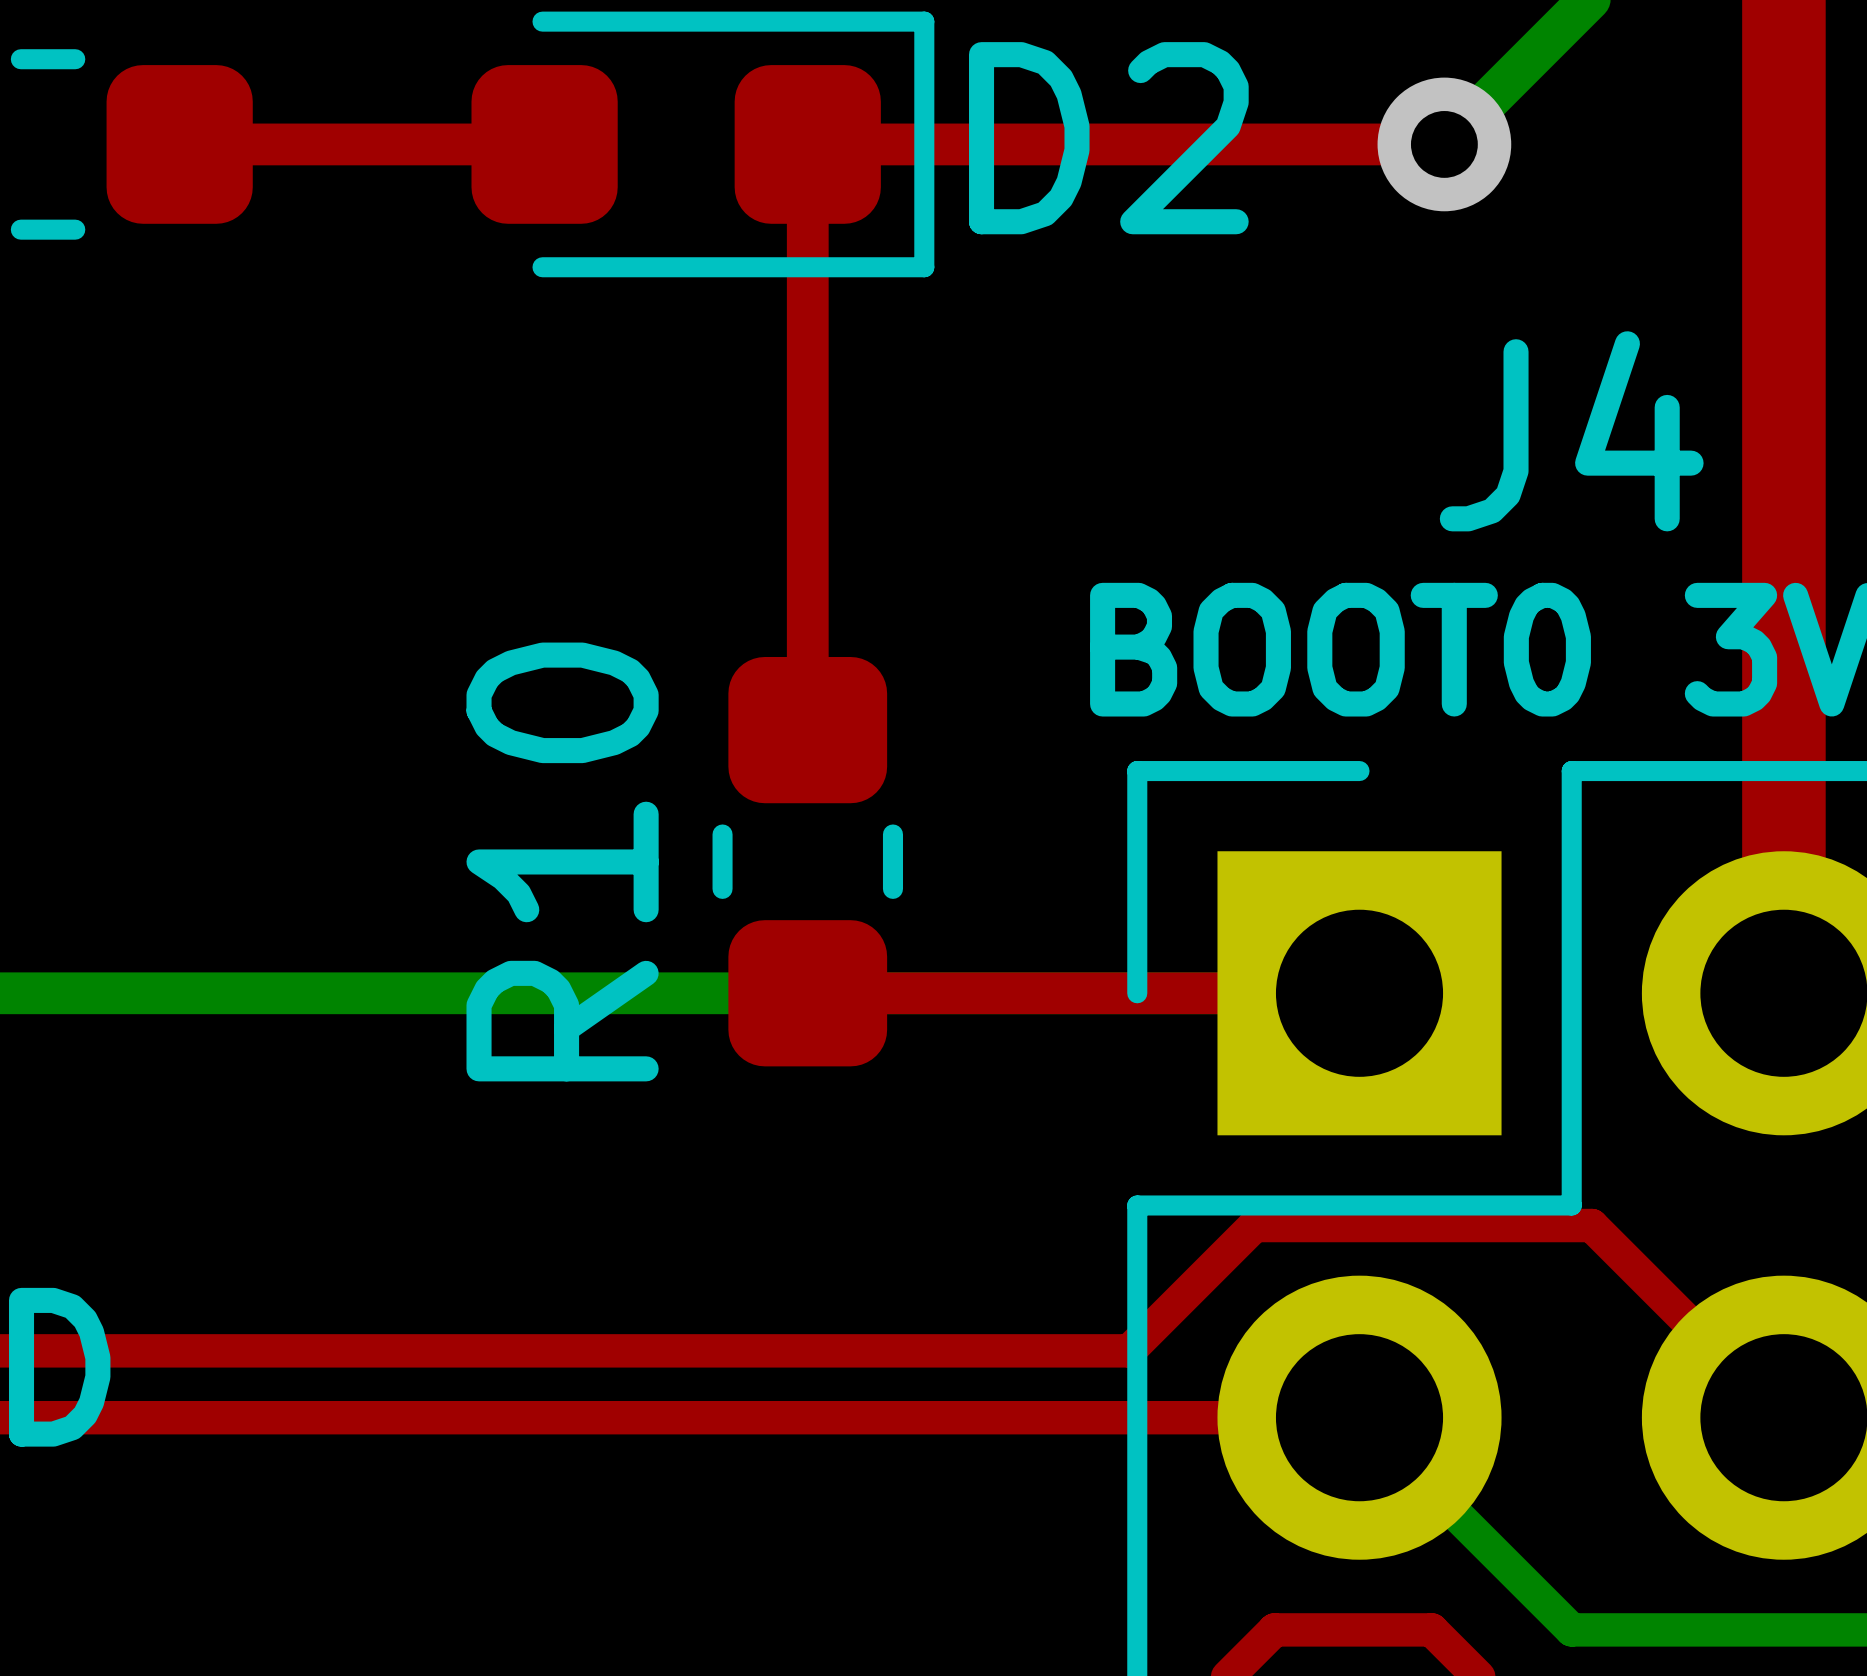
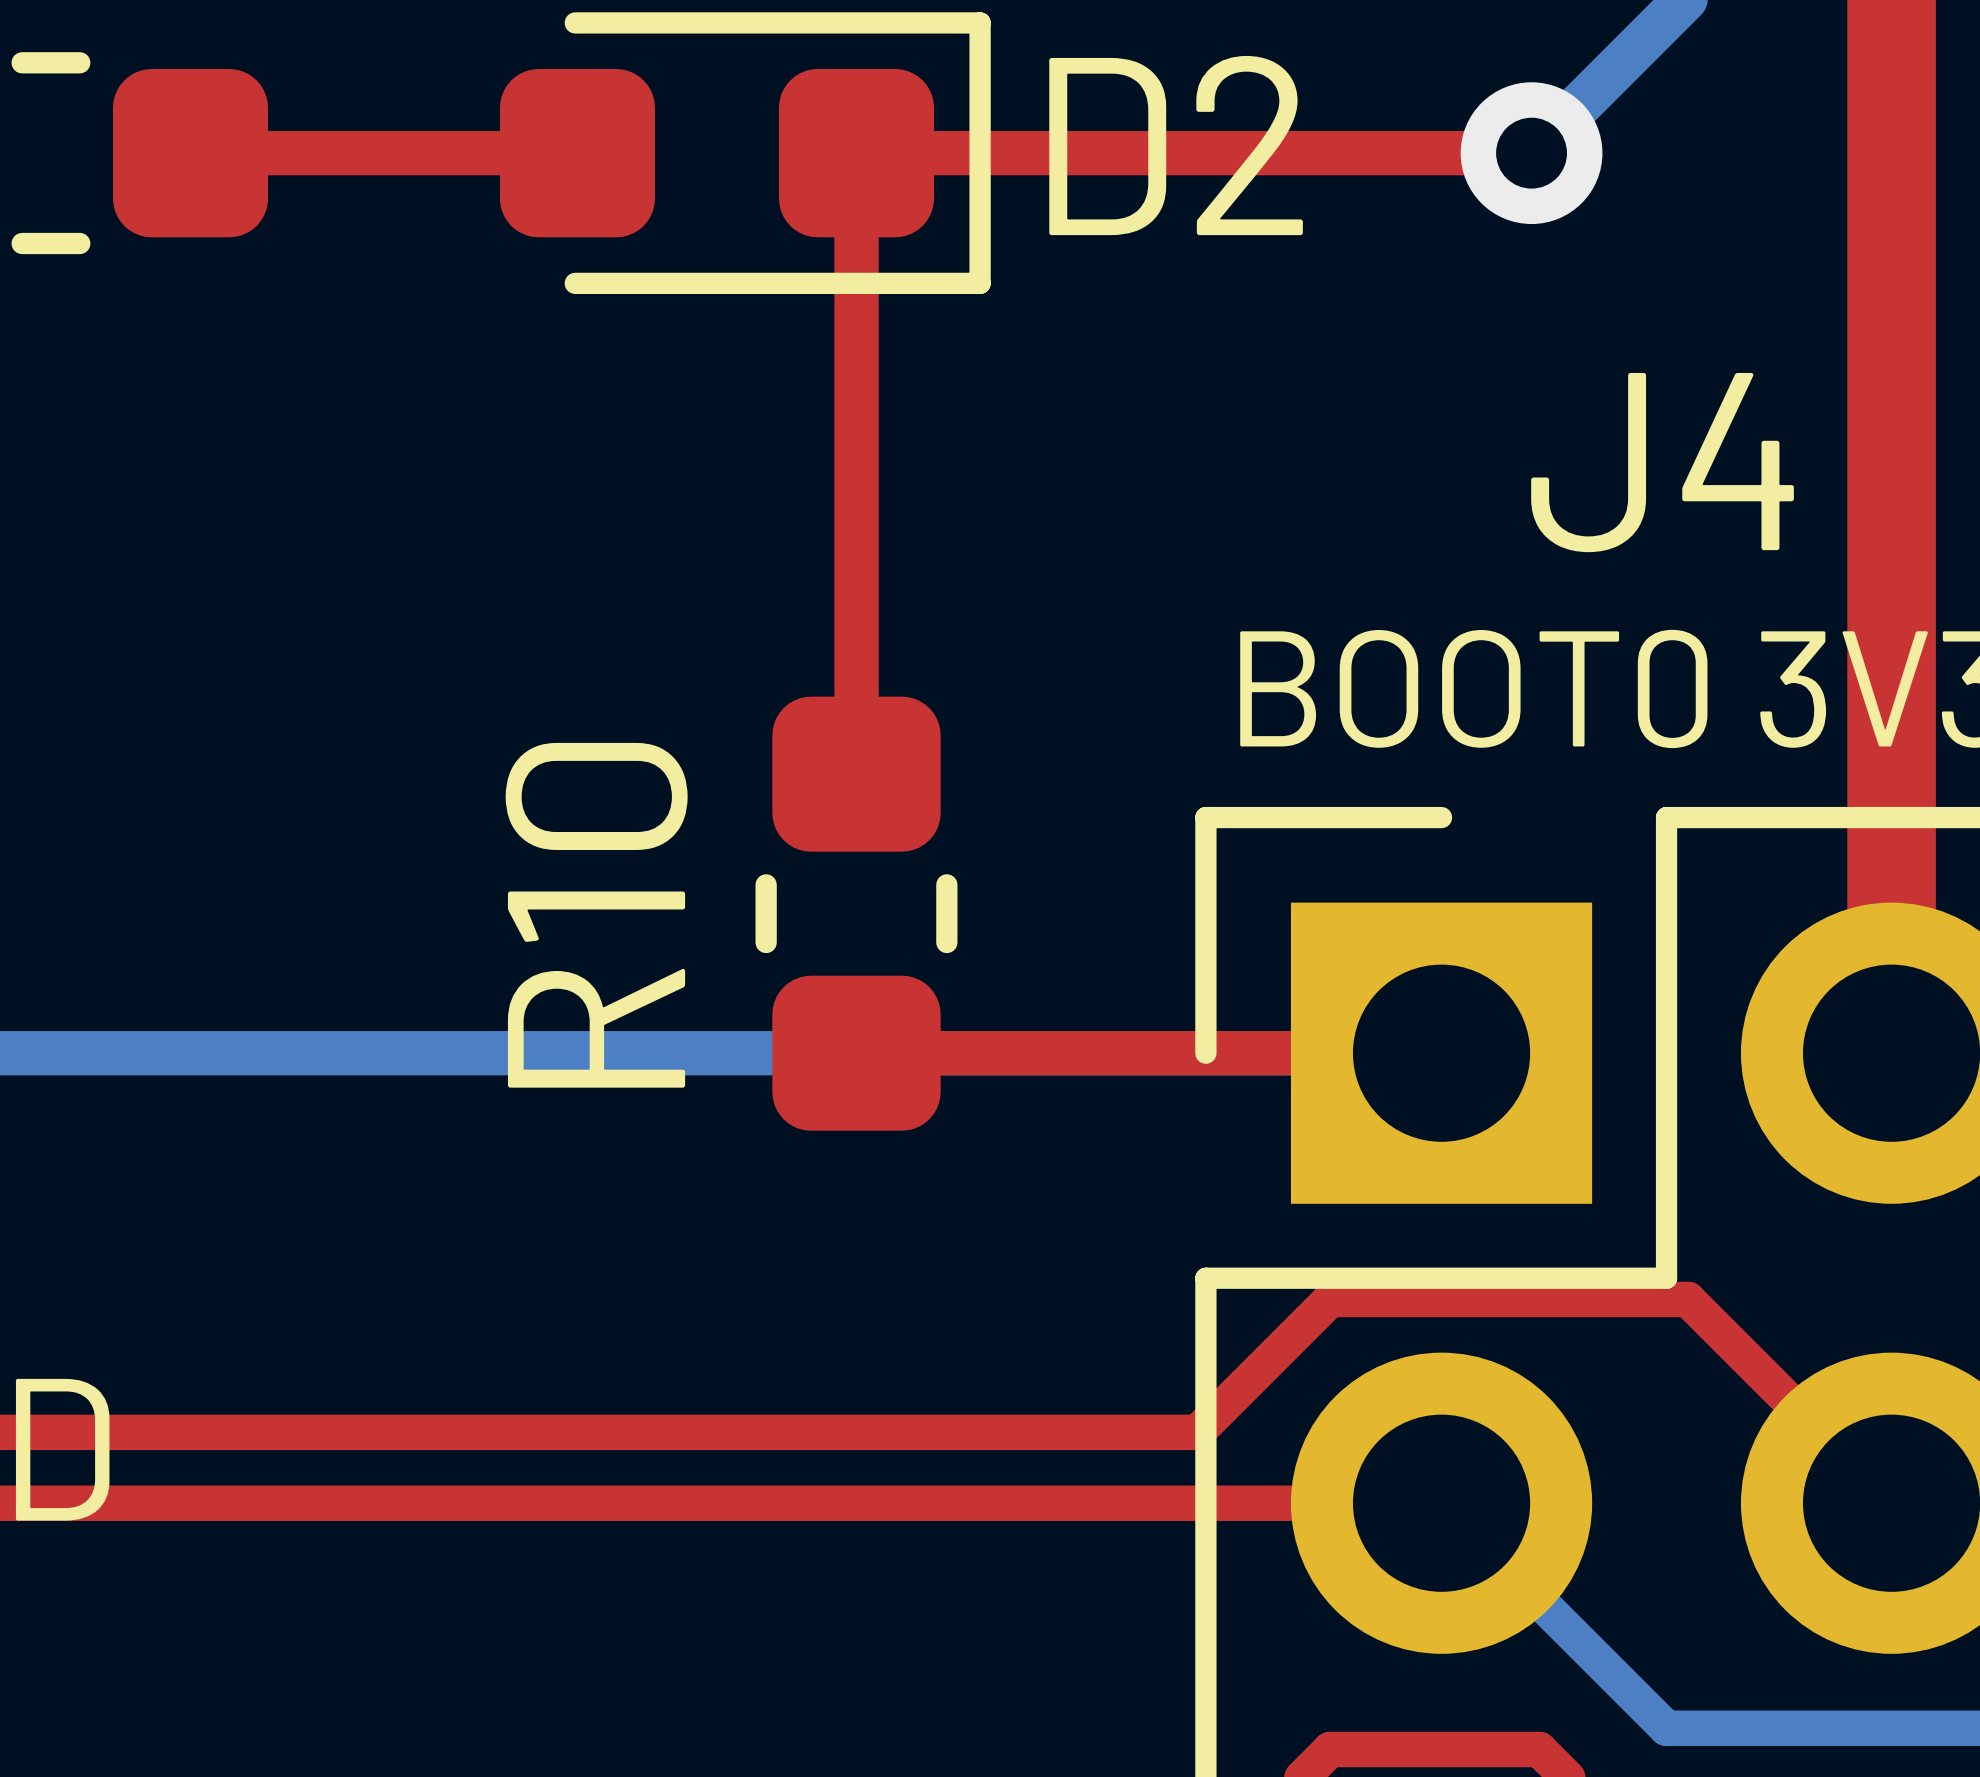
top track: (1254, 1649) (1274, 1629) (1431, 1629) (1451, 1649) -> (1330, 1749) (1539, 1749)

